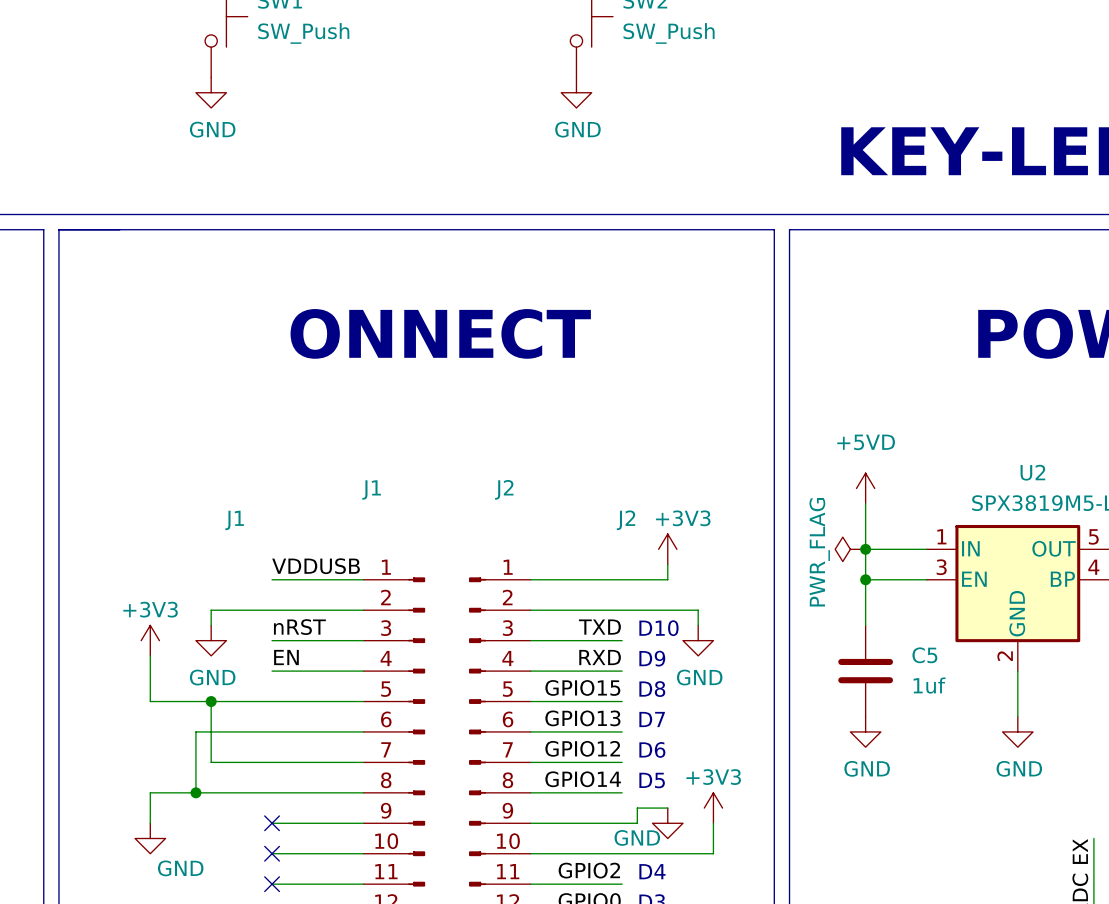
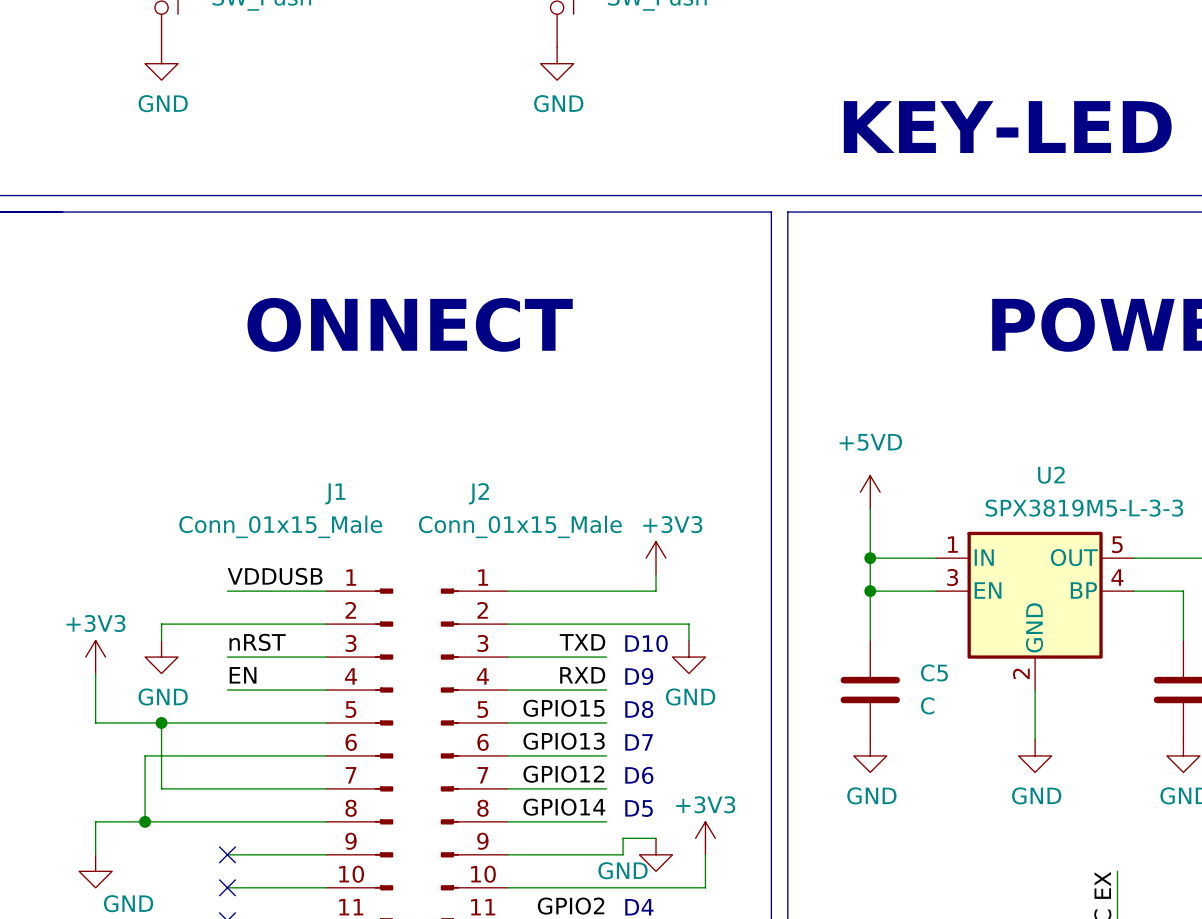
J1 value: J1 (234, 520) -> Conn_01x15_Male (280, 526)
J2 value: J2 (626, 520) -> Conn_01x15_Male (520, 526)
power symbol: PWR_FLAG (850, 549) -> none
C5 value: 1uf (929, 685) -> C (927, 705)

